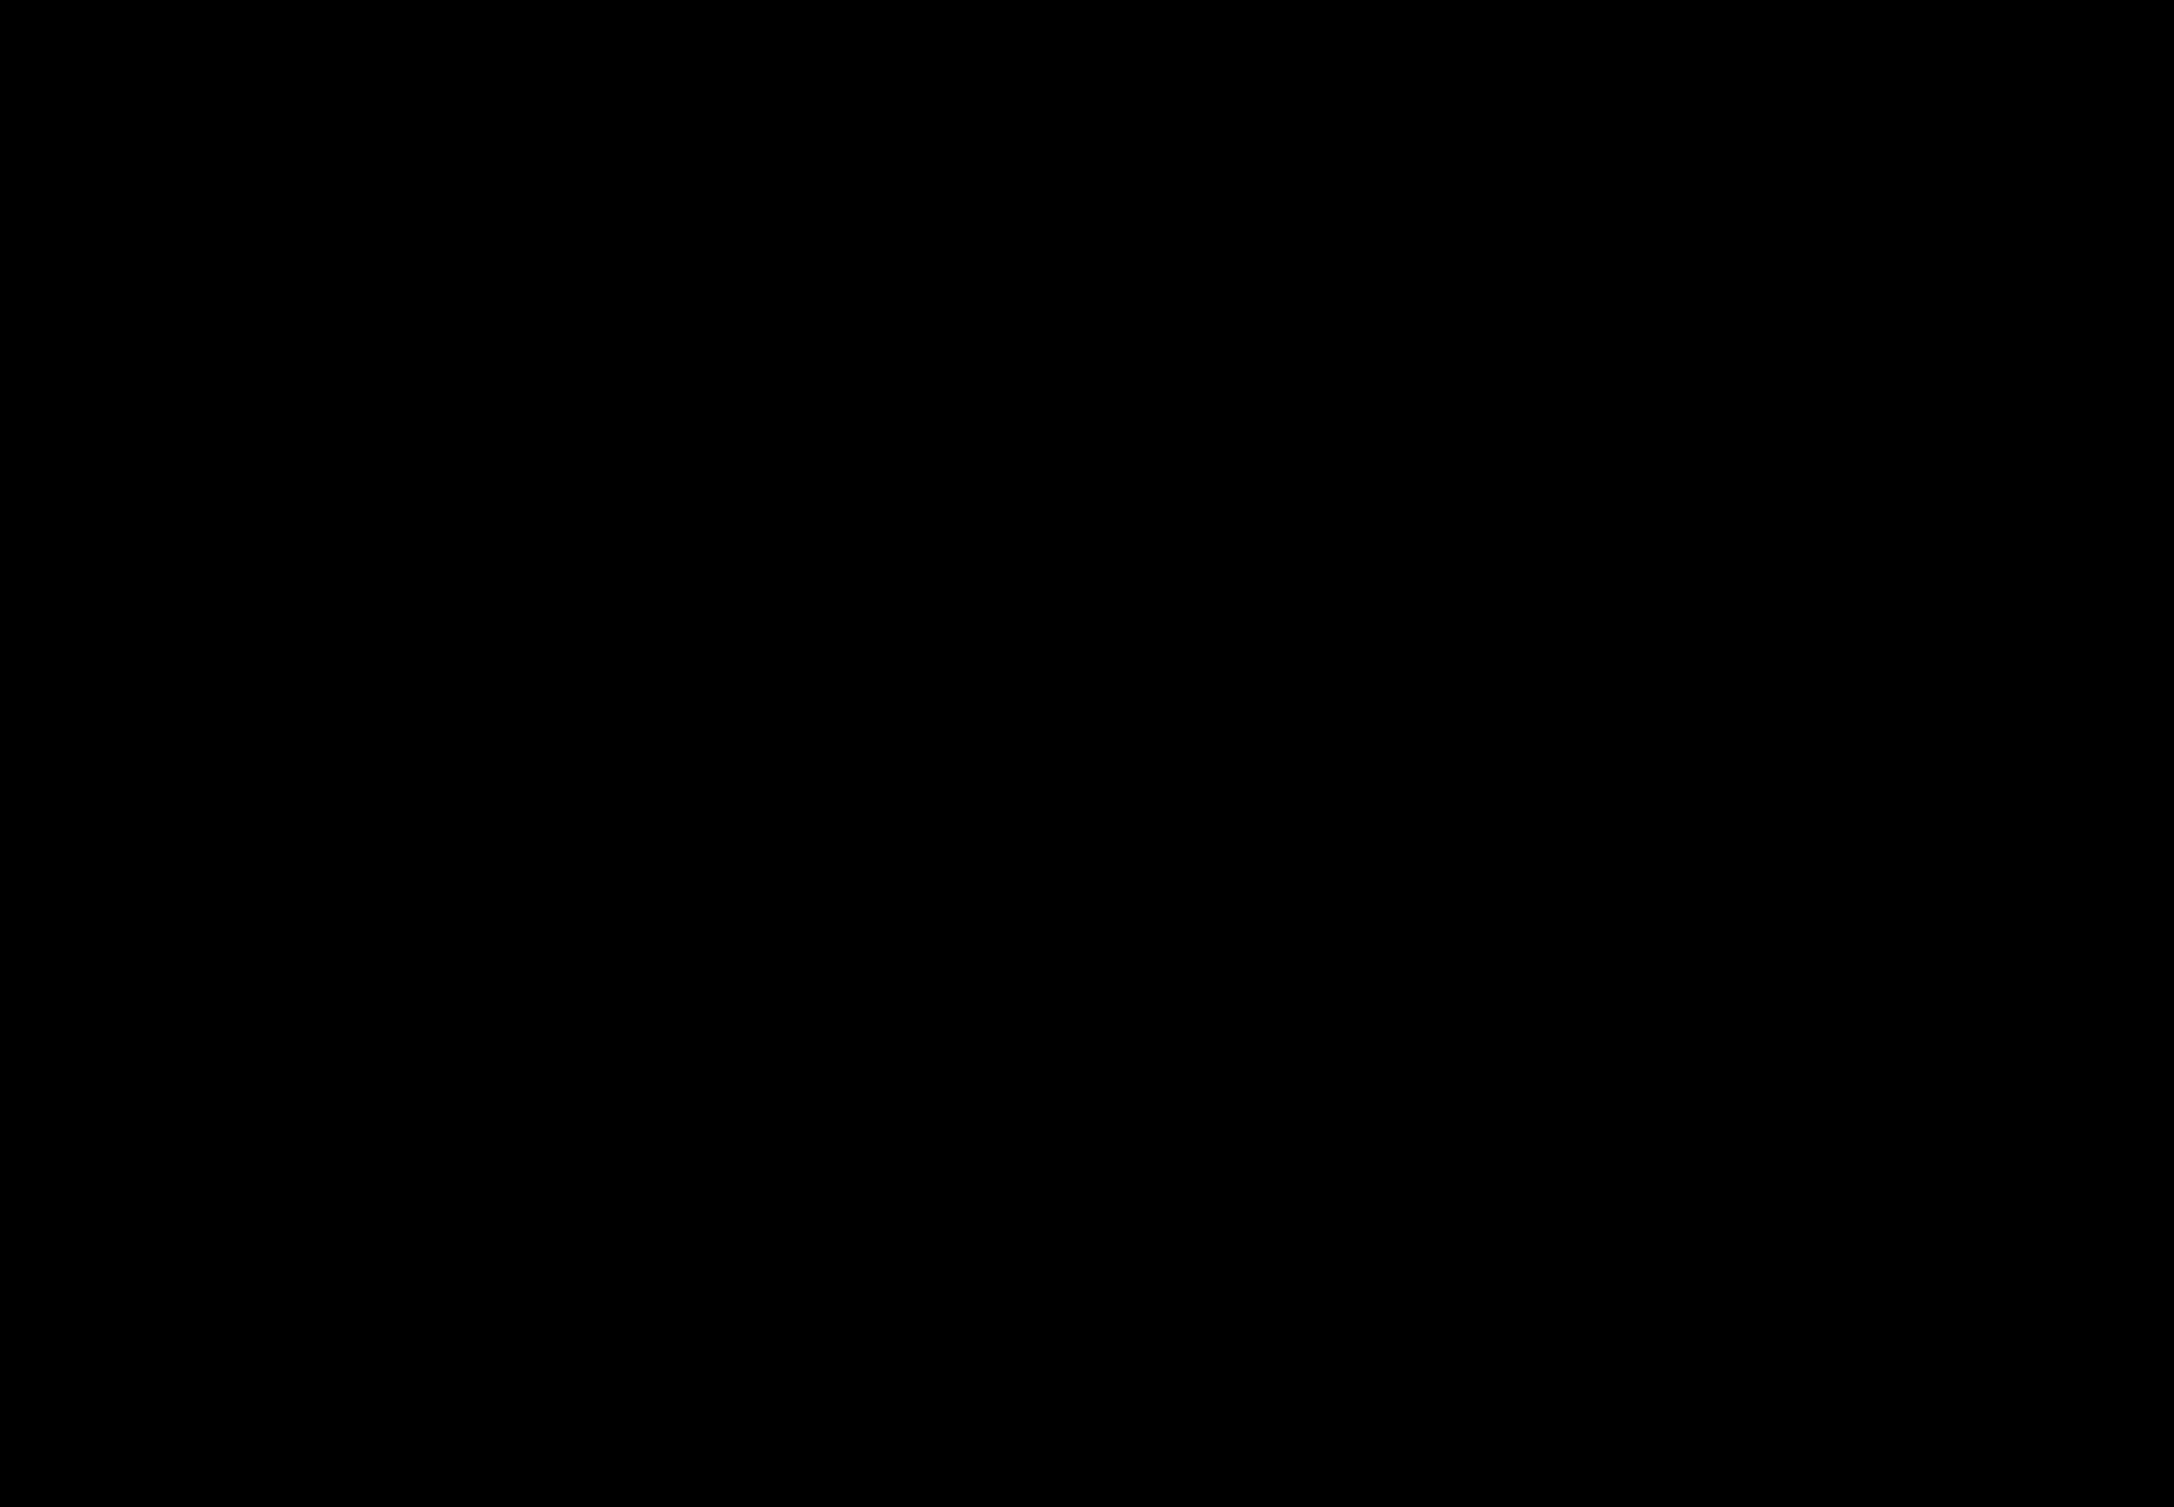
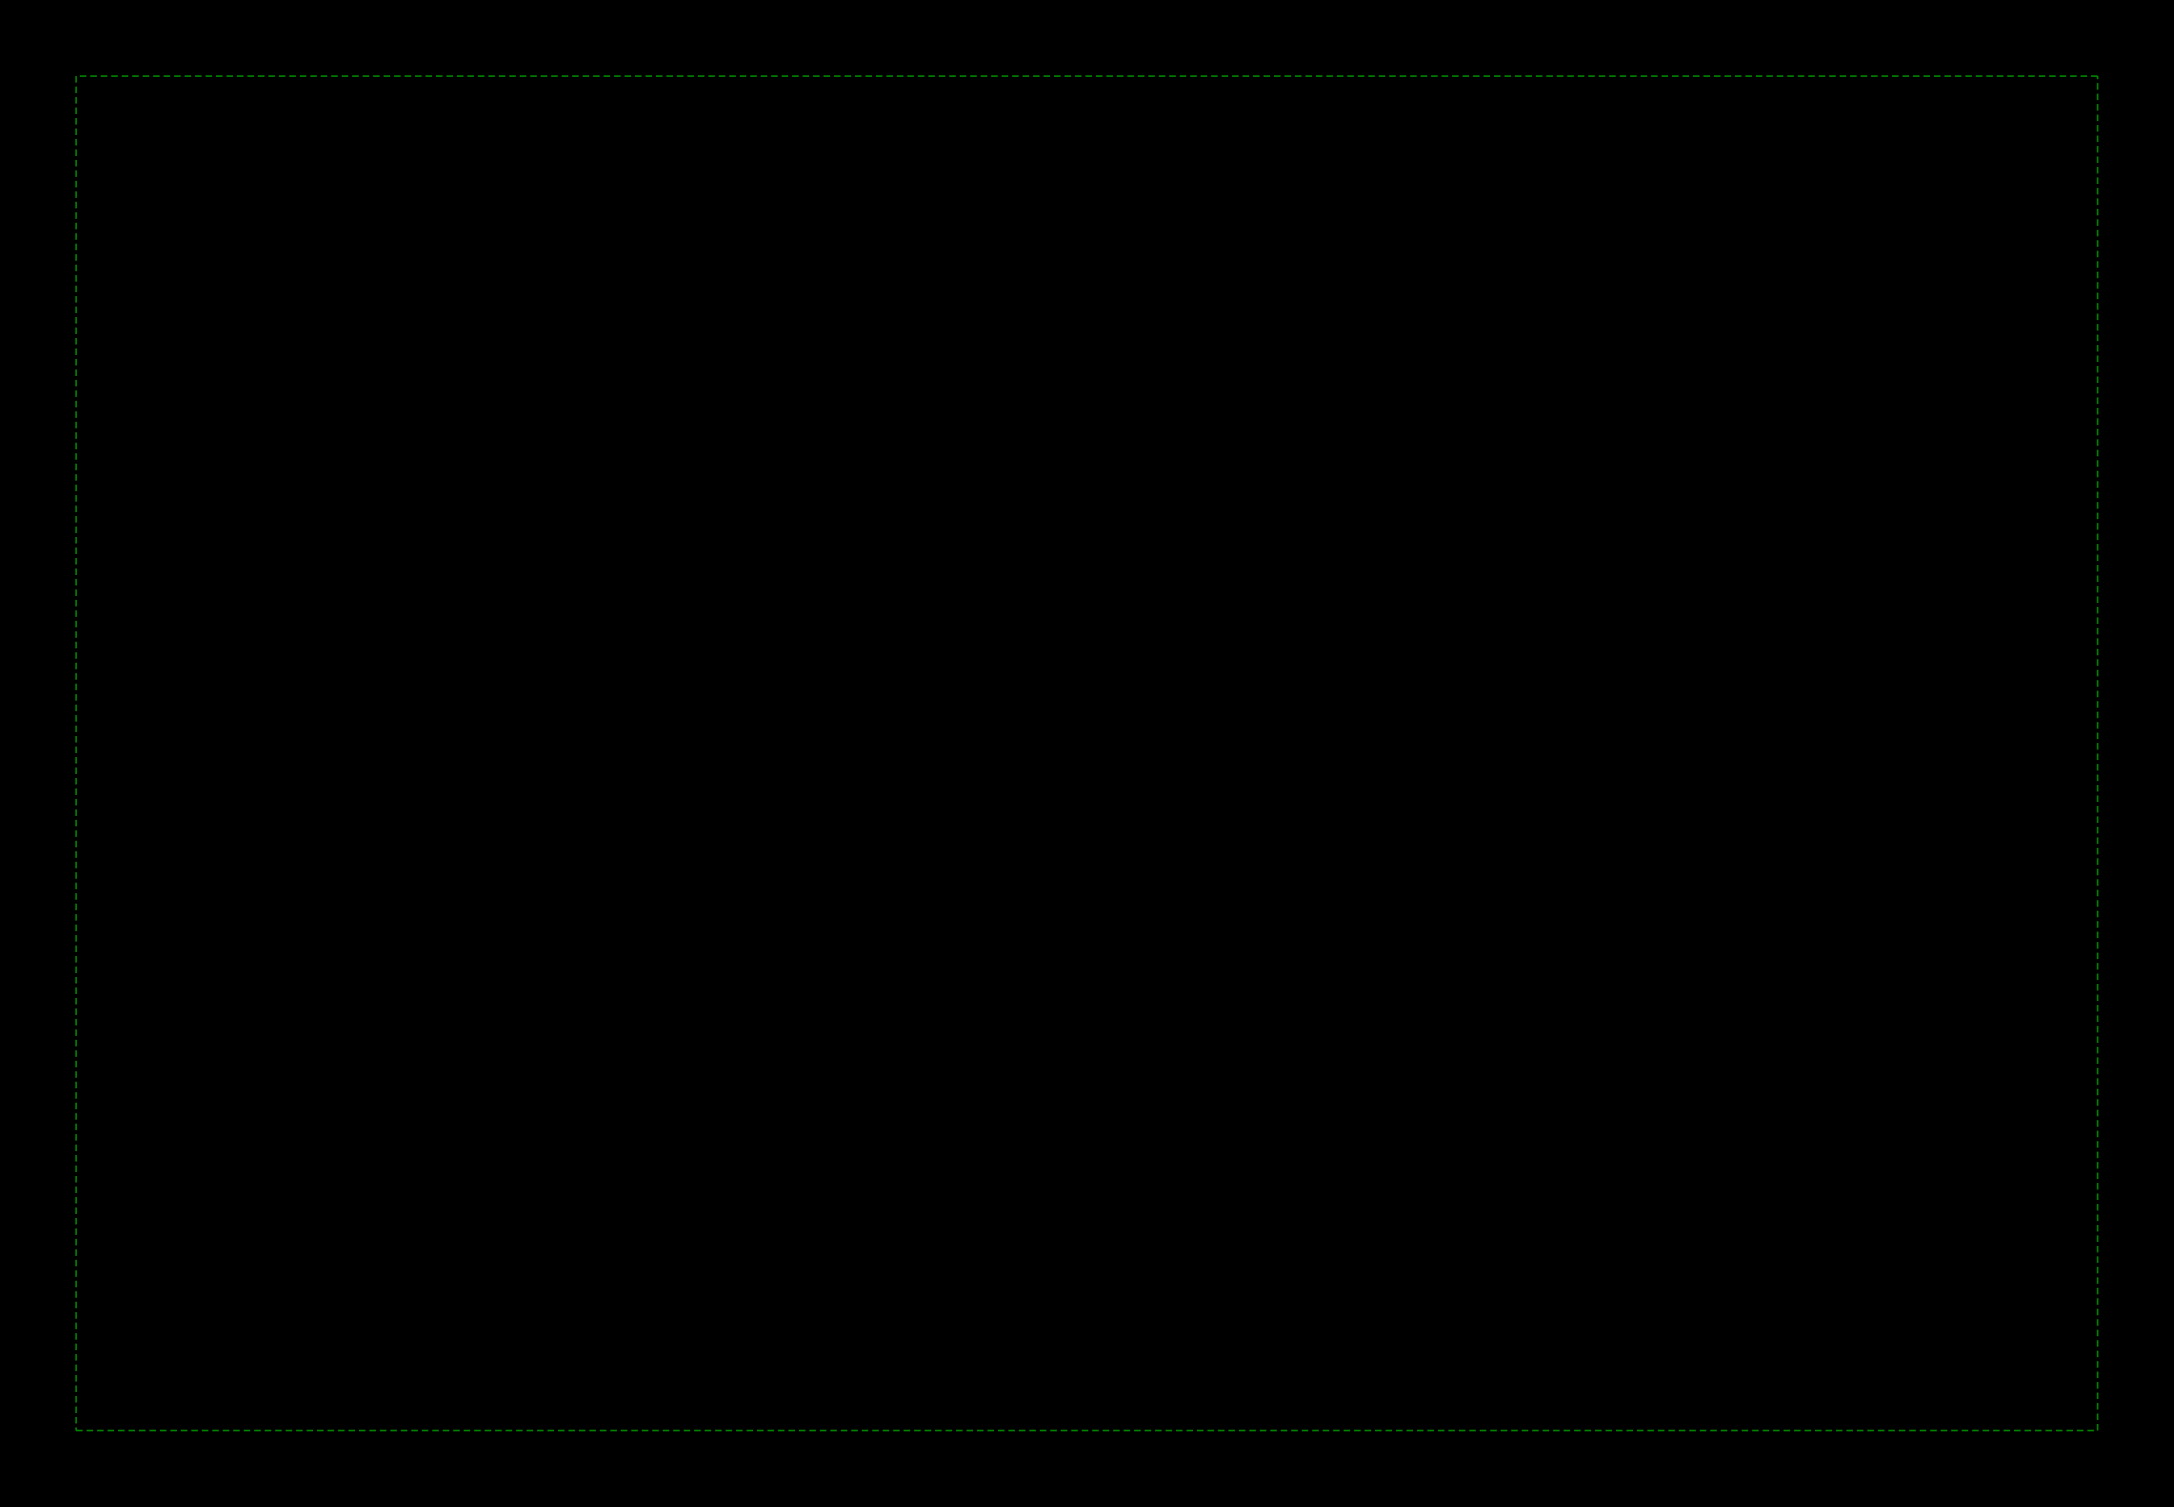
zone outline: none -> (2097, 76) (2097, 1430) (76, 1430) (76, 76) (2097, 76)

